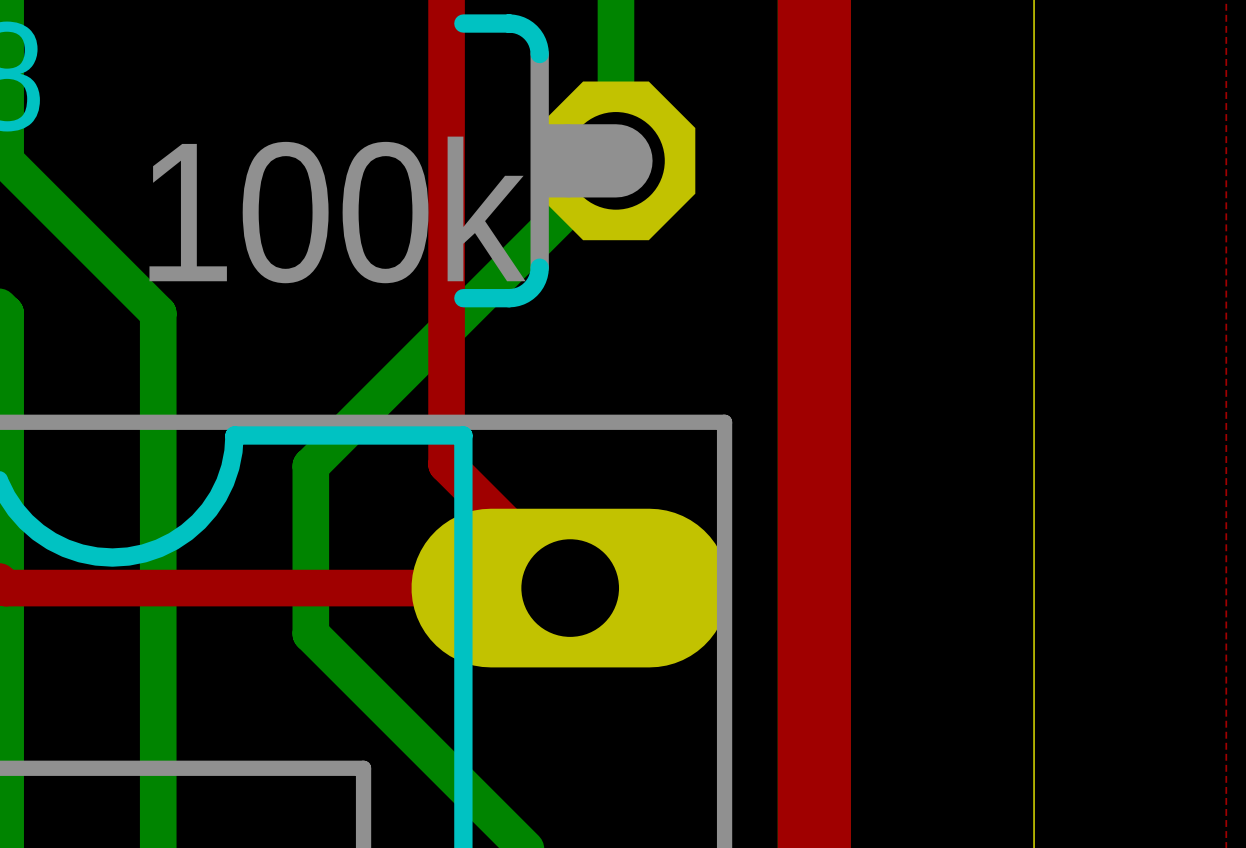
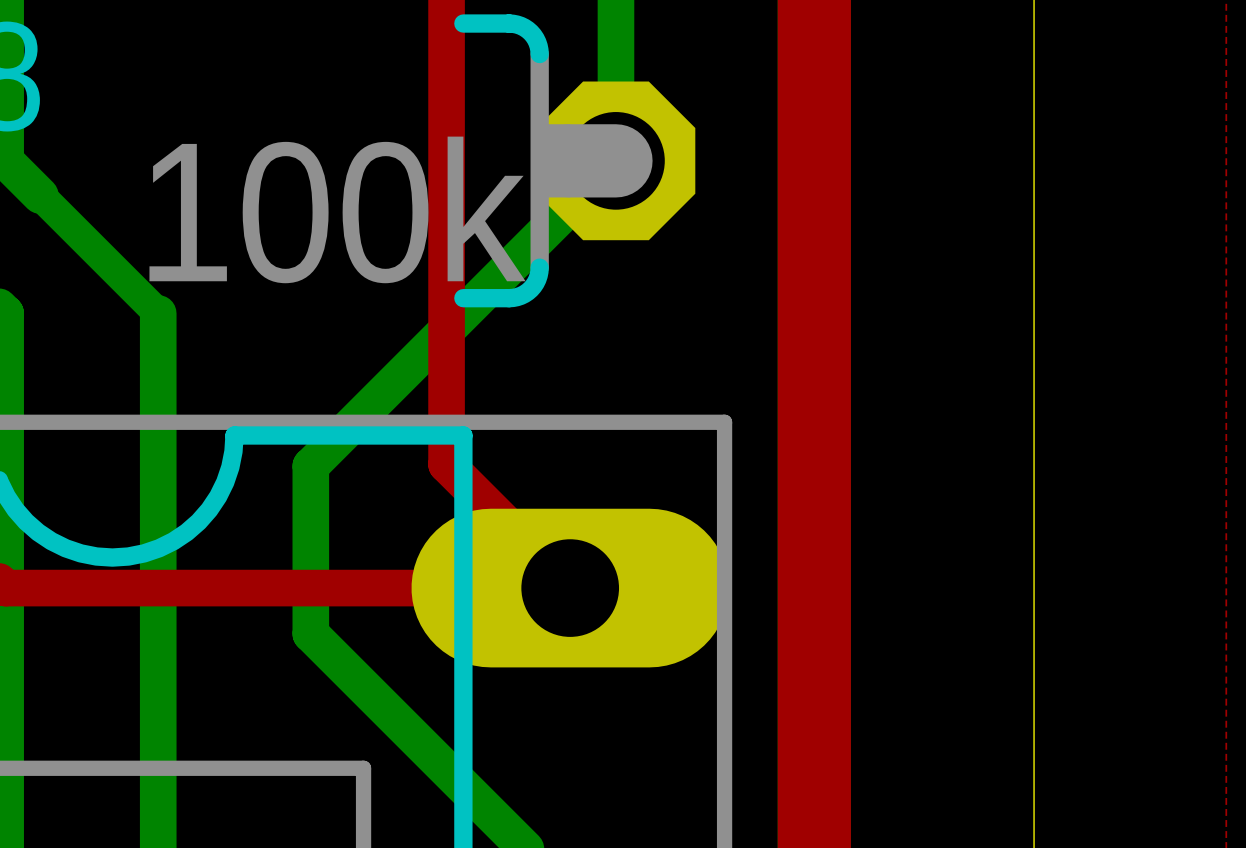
bottom track width: thick (40, 195) (158, 313) -> thin (40, 195) (158, 313)

